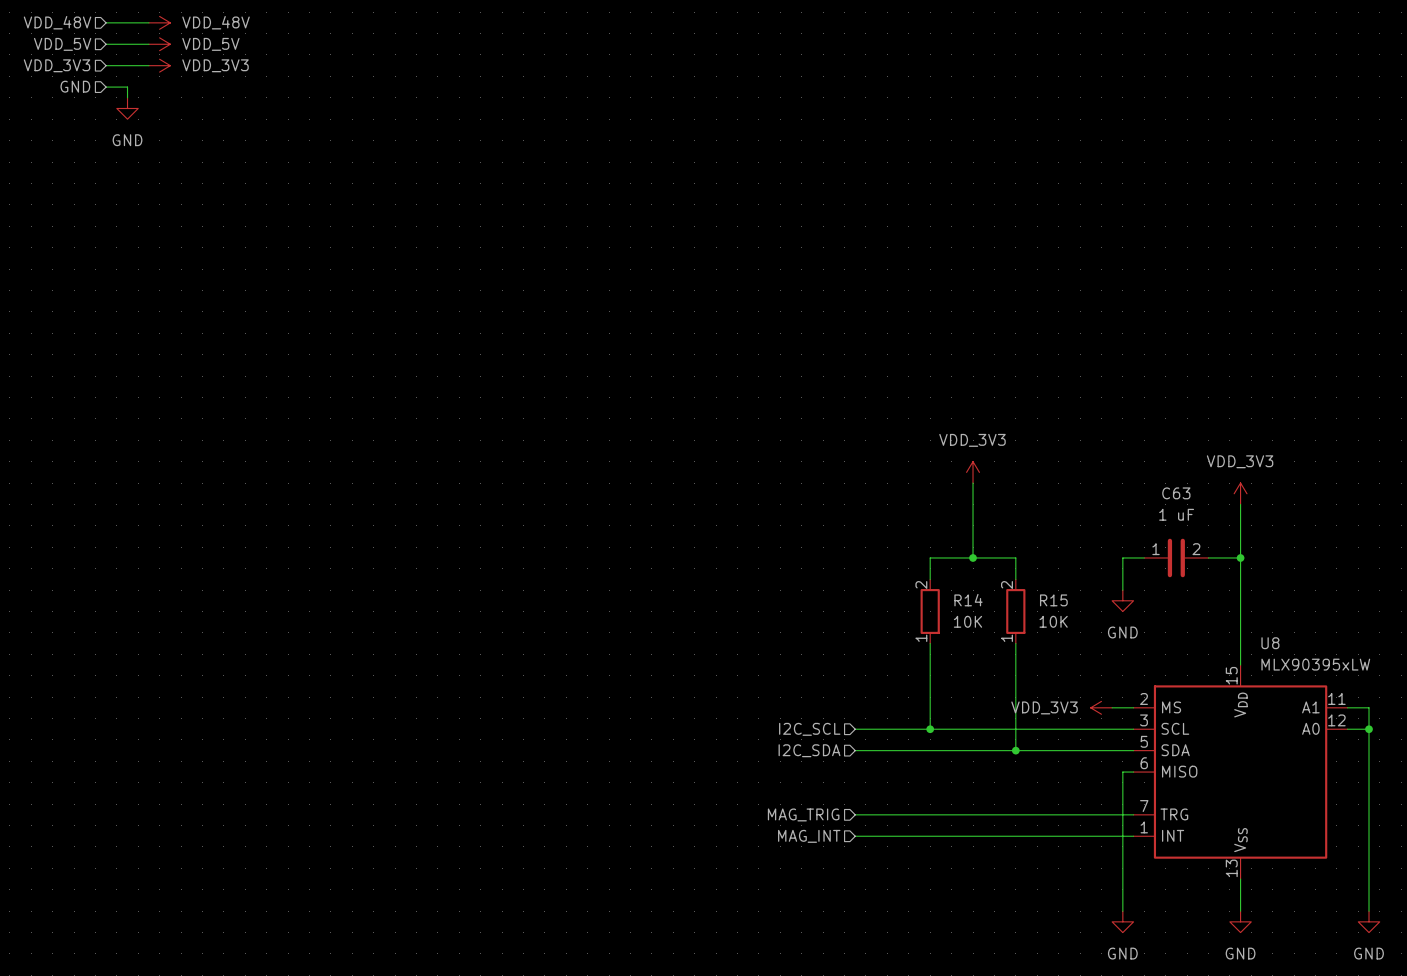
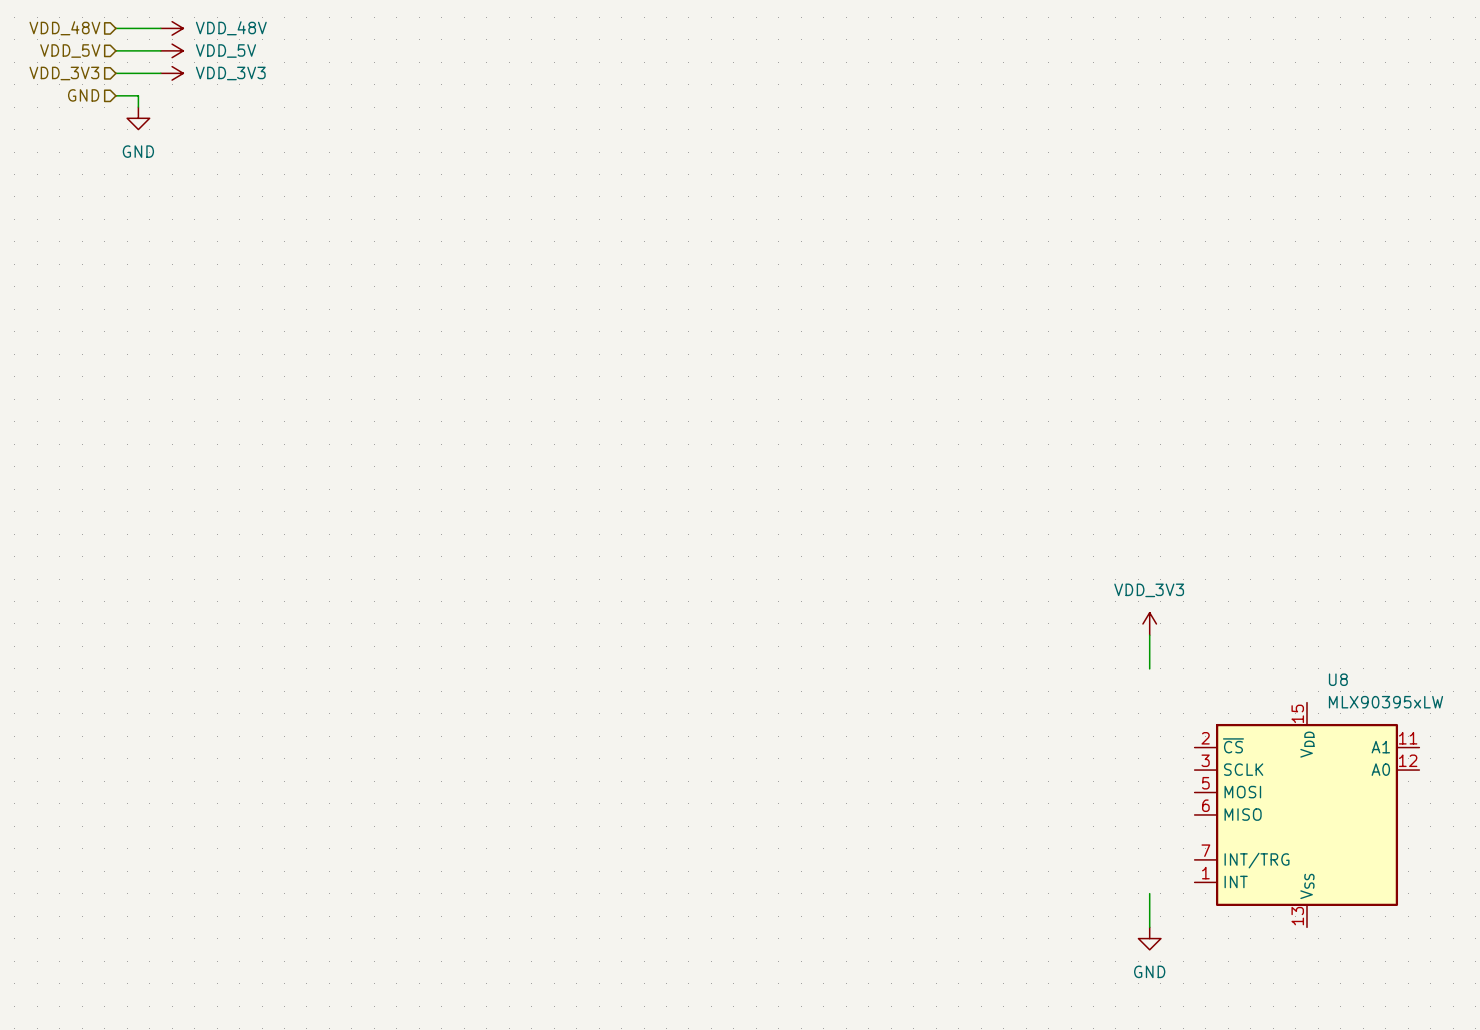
power symbol: VDD_3V3 (973, 472) -> none
wire: (973, 483) (973, 557) -> none
power symbol: VDD_3V3 (1240, 493) -> none
wire: (1240, 504) (1240, 665) -> none
junction: (973, 557) -> none
wire: (1144, 557) (1122, 557) (1122, 590) -> none
C63: 1 uF (1176, 557) -> none
wire: (1208, 557) (1240, 557) -> none
junction: (1240, 557) -> none
wire: (930, 579) (930, 557) (1015, 557) (1015, 579) -> none
power symbol: none -> VDD_3V3 (1149, 623)
wire: none -> (1149, 635) (1149, 668)
power symbol: GND (1122, 600) -> none
R14: 10K (930, 611) -> none
R15: 10K (1015, 611) -> none
wire: (930, 643) (930, 729) -> none
wire: (1015, 643) (1015, 750) -> none
power symbol: VDD_3V3 (1101, 707) -> none
wire: (1112, 707) (1133, 707) -> none
U8 pin name: MS (1171, 707) -> ~{CS} (1233, 745)
wire: (1347, 707) (1369, 707) (1369, 911) -> none
U8 pin name: SCL (1175, 728) -> SCLK (1243, 769)
hierarchical label: I2C_SCL (809, 729) -> none
wire: (855, 729) (1133, 729) -> none
junction: (930, 729) -> none
wire: (1347, 729) (1369, 729) -> none
junction: (1369, 729) -> none
hierarchical label: I2C_SDA (809, 750) -> none
wire: (855, 750) (1133, 750) -> none
junction: (1015, 750) -> none
U8 pin name: SDA (1175, 750) -> MOSI (1242, 792)
wire: (1133, 772) (1122, 772) (1122, 911) -> none
hierarchical label: MAG_TRIG (803, 814) -> none
wire: (855, 814) (1133, 814) -> none
U8 pin name: TRG (1174, 814) -> INT/TRG (1257, 860)
hierarchical label: MAG_INT (809, 836) -> none
wire: (855, 836) (1133, 836) -> none
wire: (1240, 879) (1240, 911) -> (1149, 893) (1149, 927)
power symbol position: GND (1122, 921) -> GND (1149, 938)
power symbol: GND (1240, 921) -> none
power symbol: GND (1369, 921) -> none

